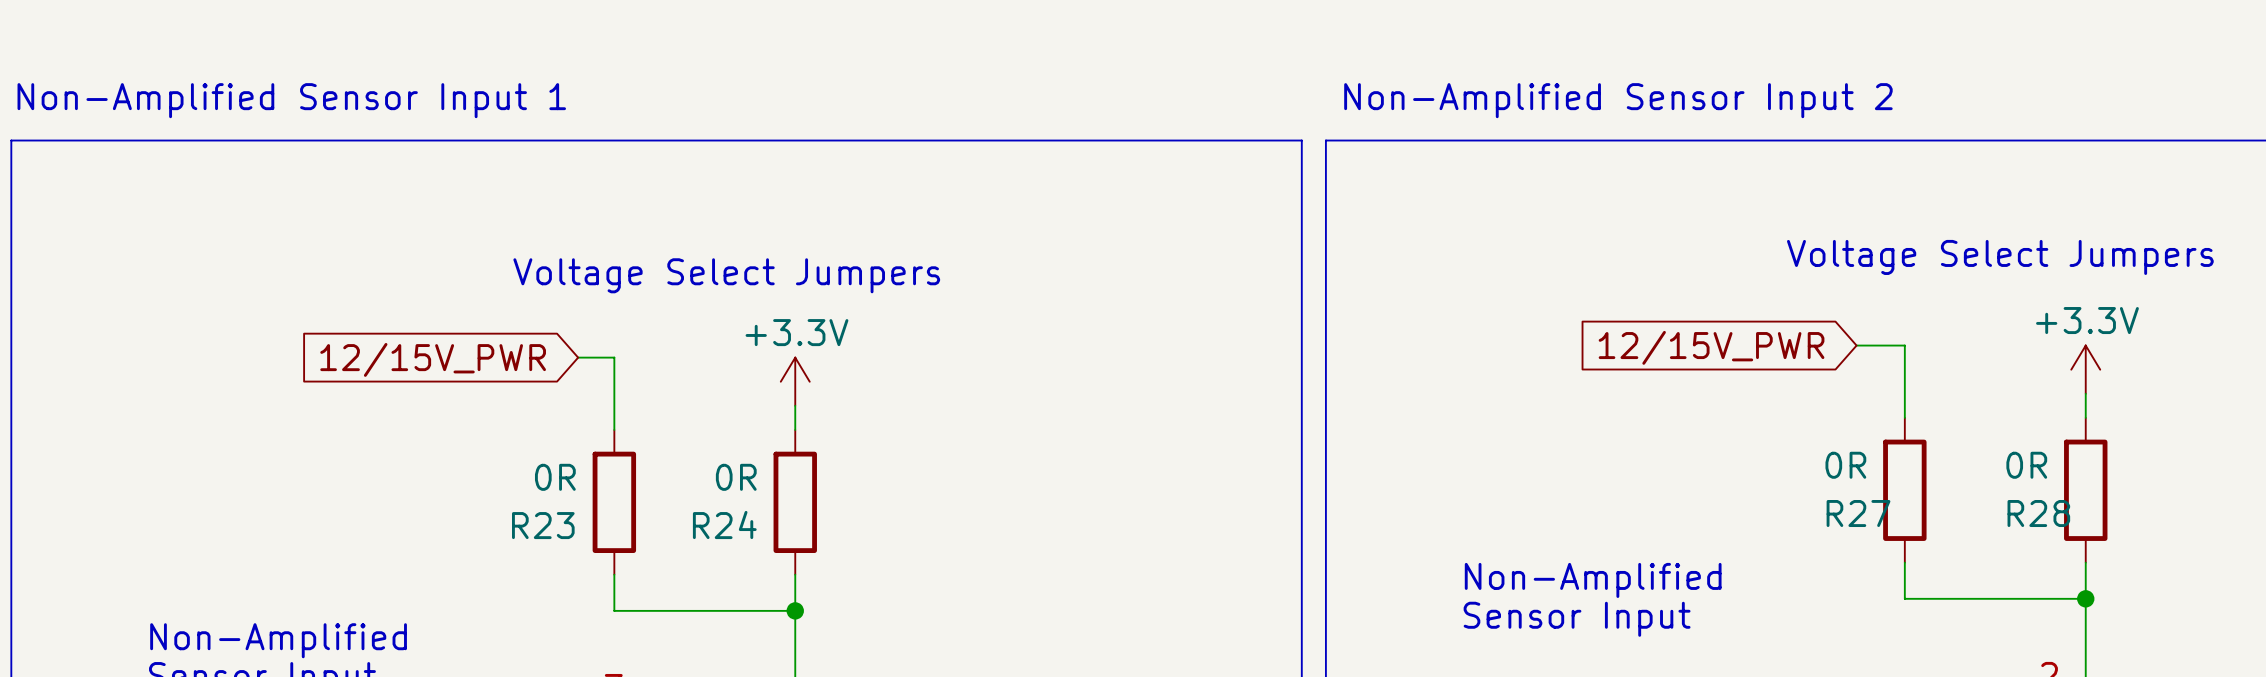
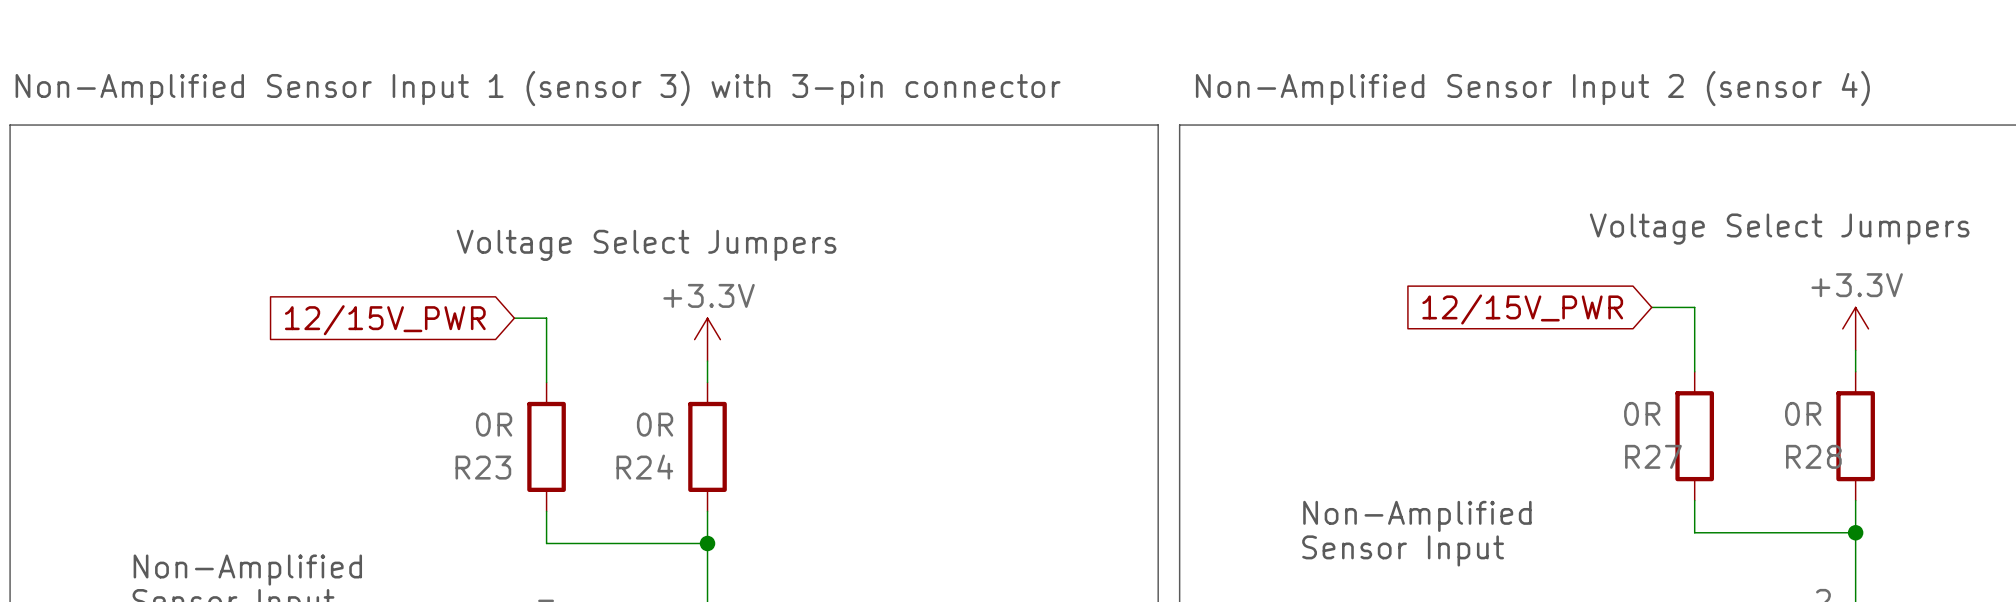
text: Non-Amplified Sensor Input 1 (291, 100) -> Non-Amplified Sensor Input 1 (sensor 3) with 3-pin connector (538, 88)
text: Non-Amplified Sensor Input 2 (1618, 100) -> Non-Amplified Sensor Input 2 (sensor 4) (1532, 88)

